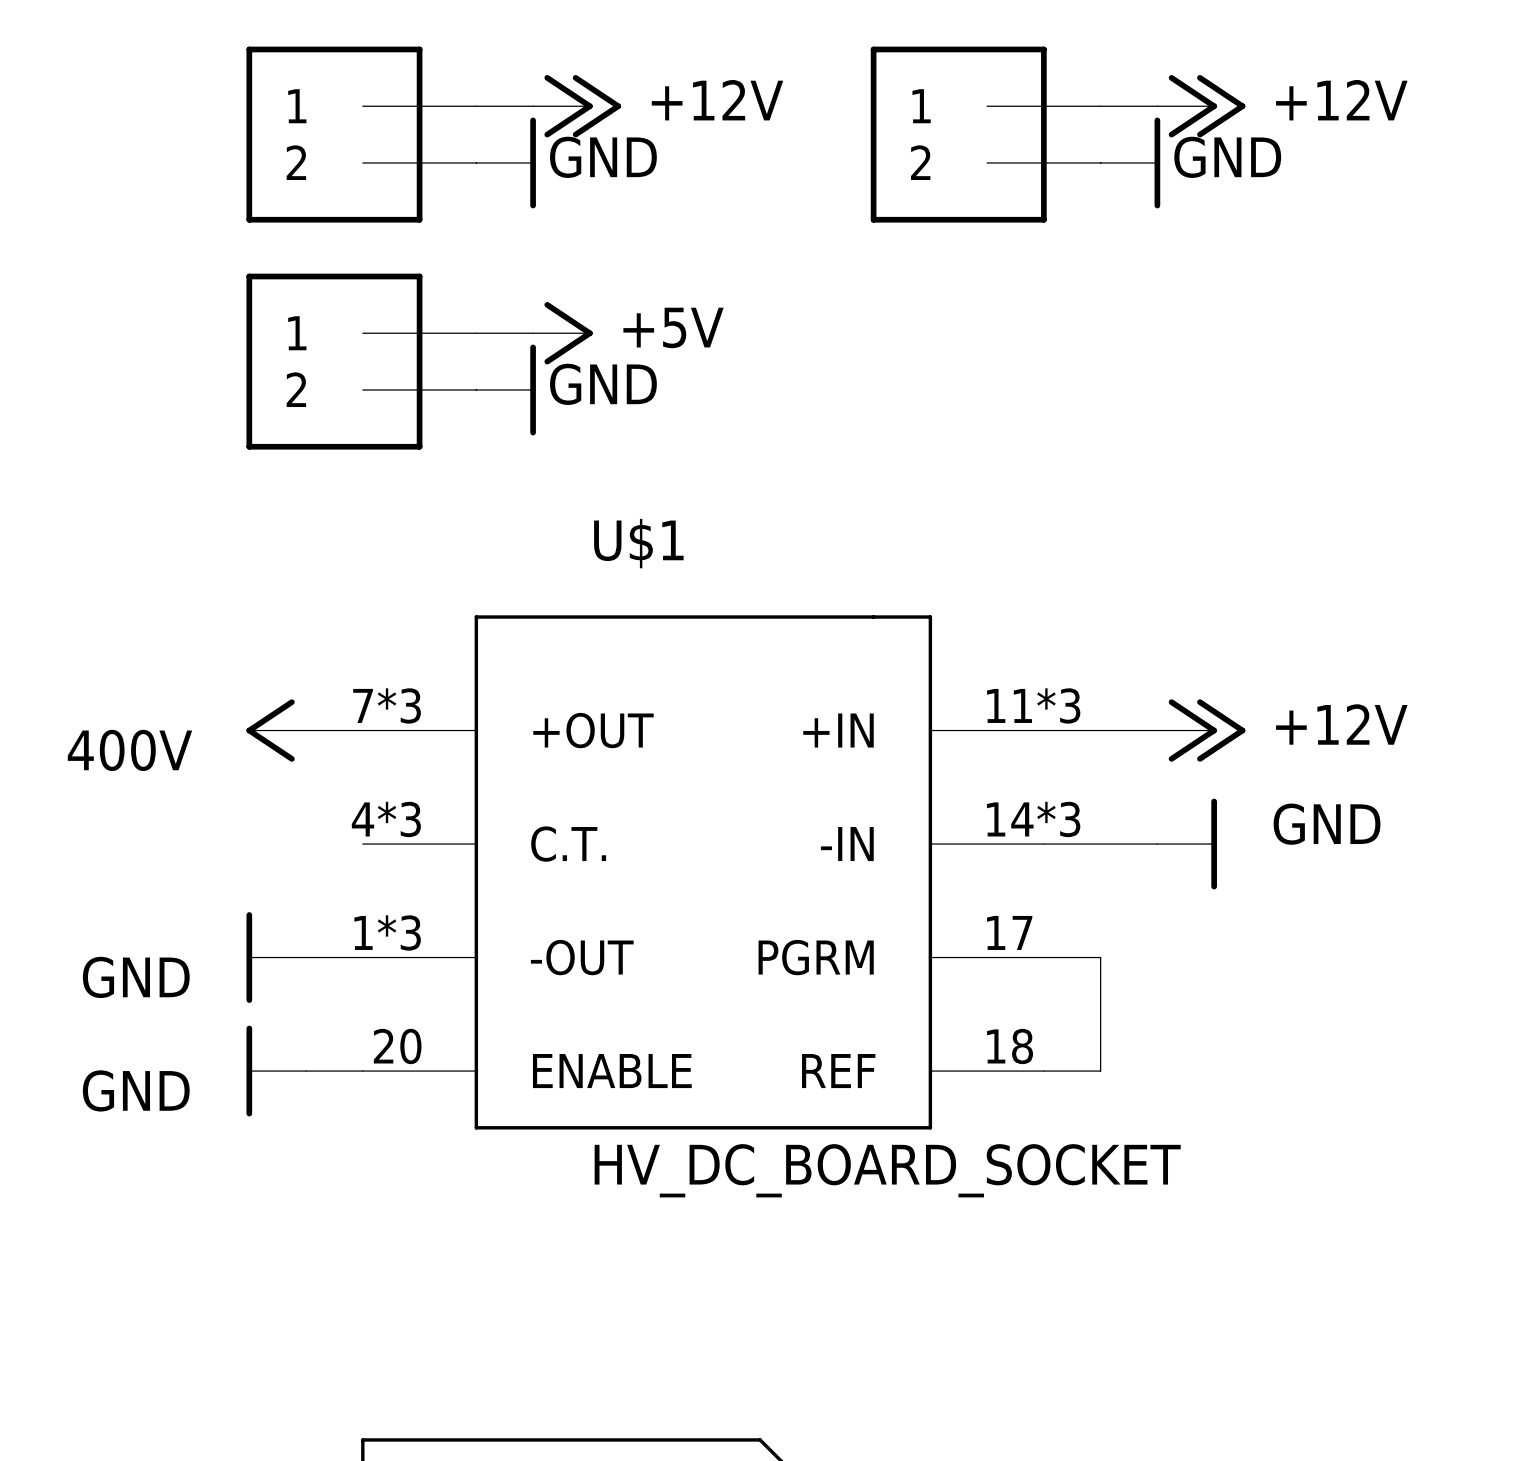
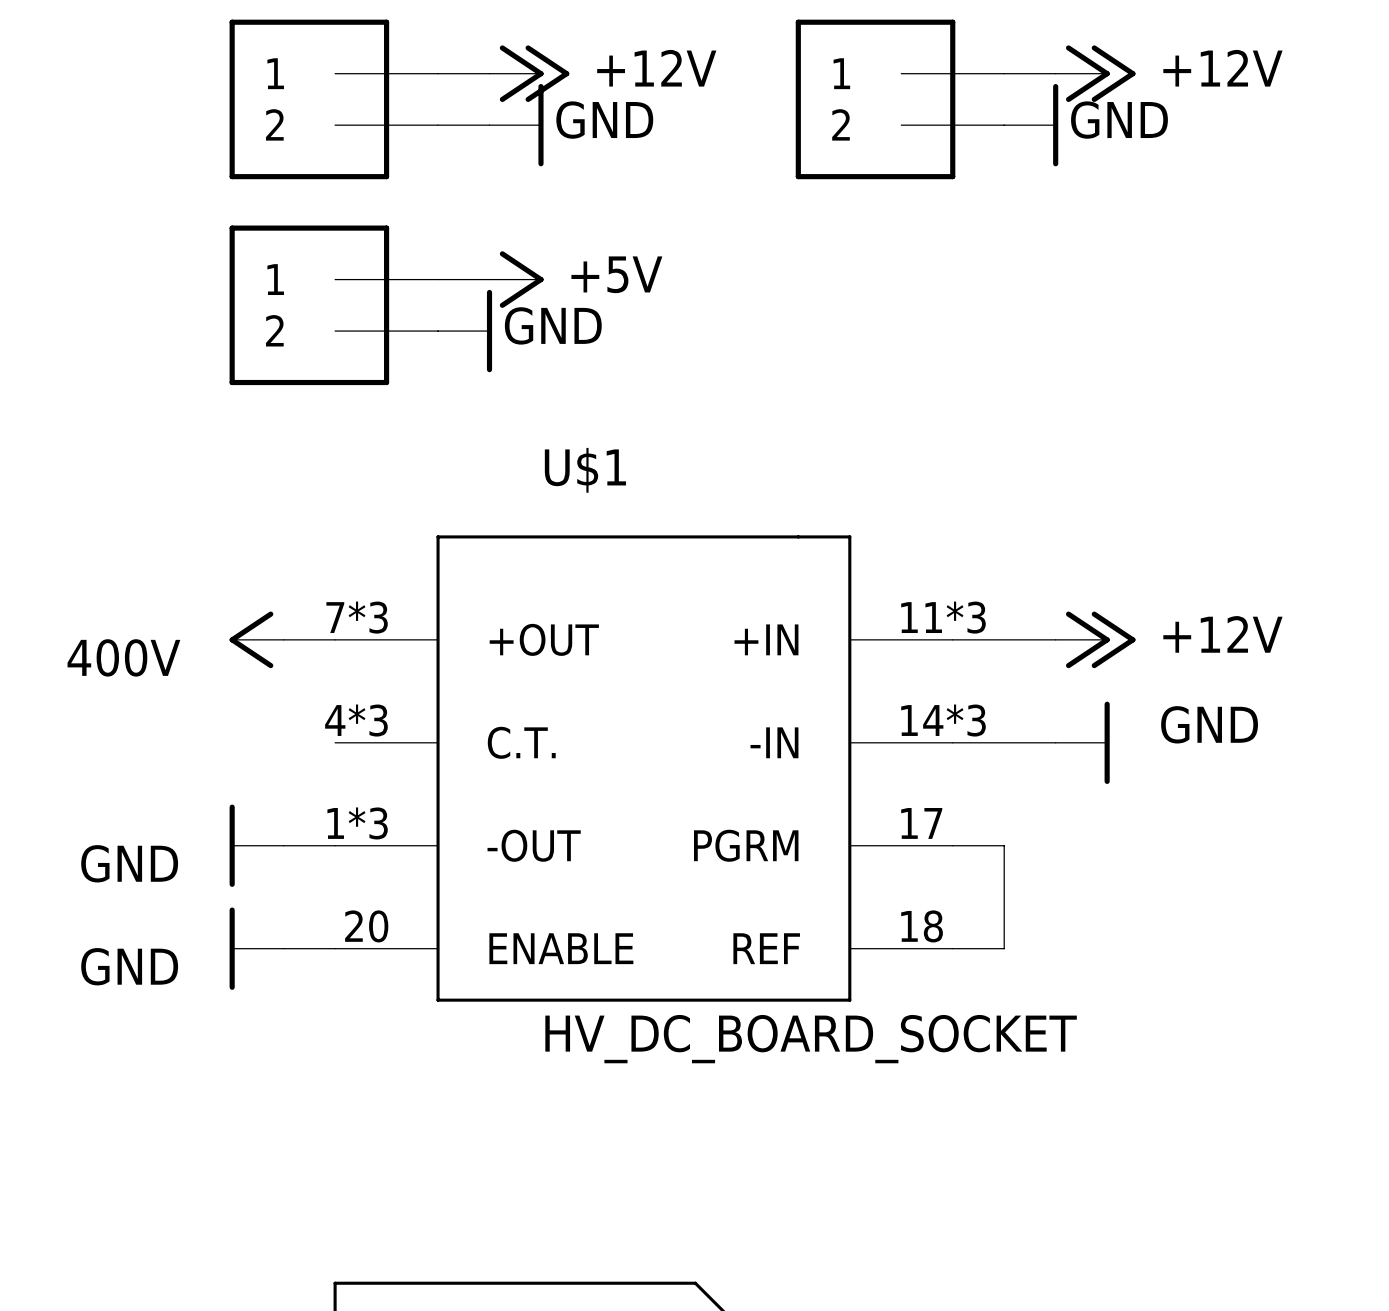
power symbol position: GND (506, 162) -> GND (516, 125)

